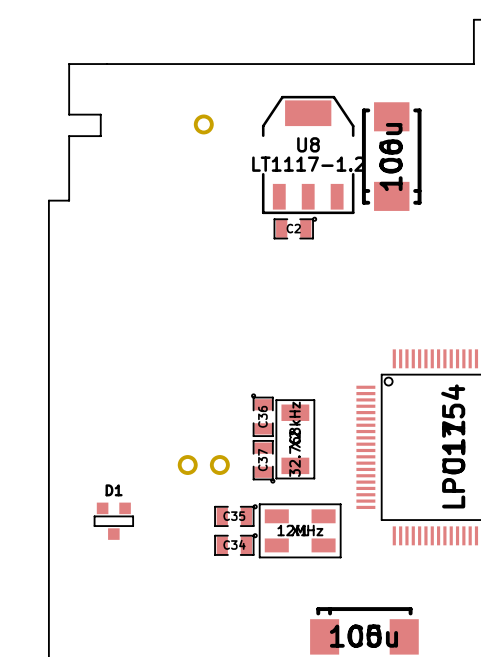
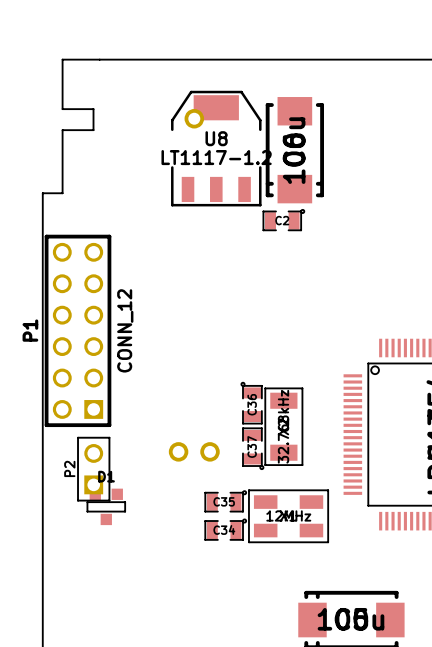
U8 position: (308, 154) -> (216, 148)
part position: (391, 156) -> (294, 150)
P1: none -> CONN_12 (78, 330)
P2: none -> (93, 469)

